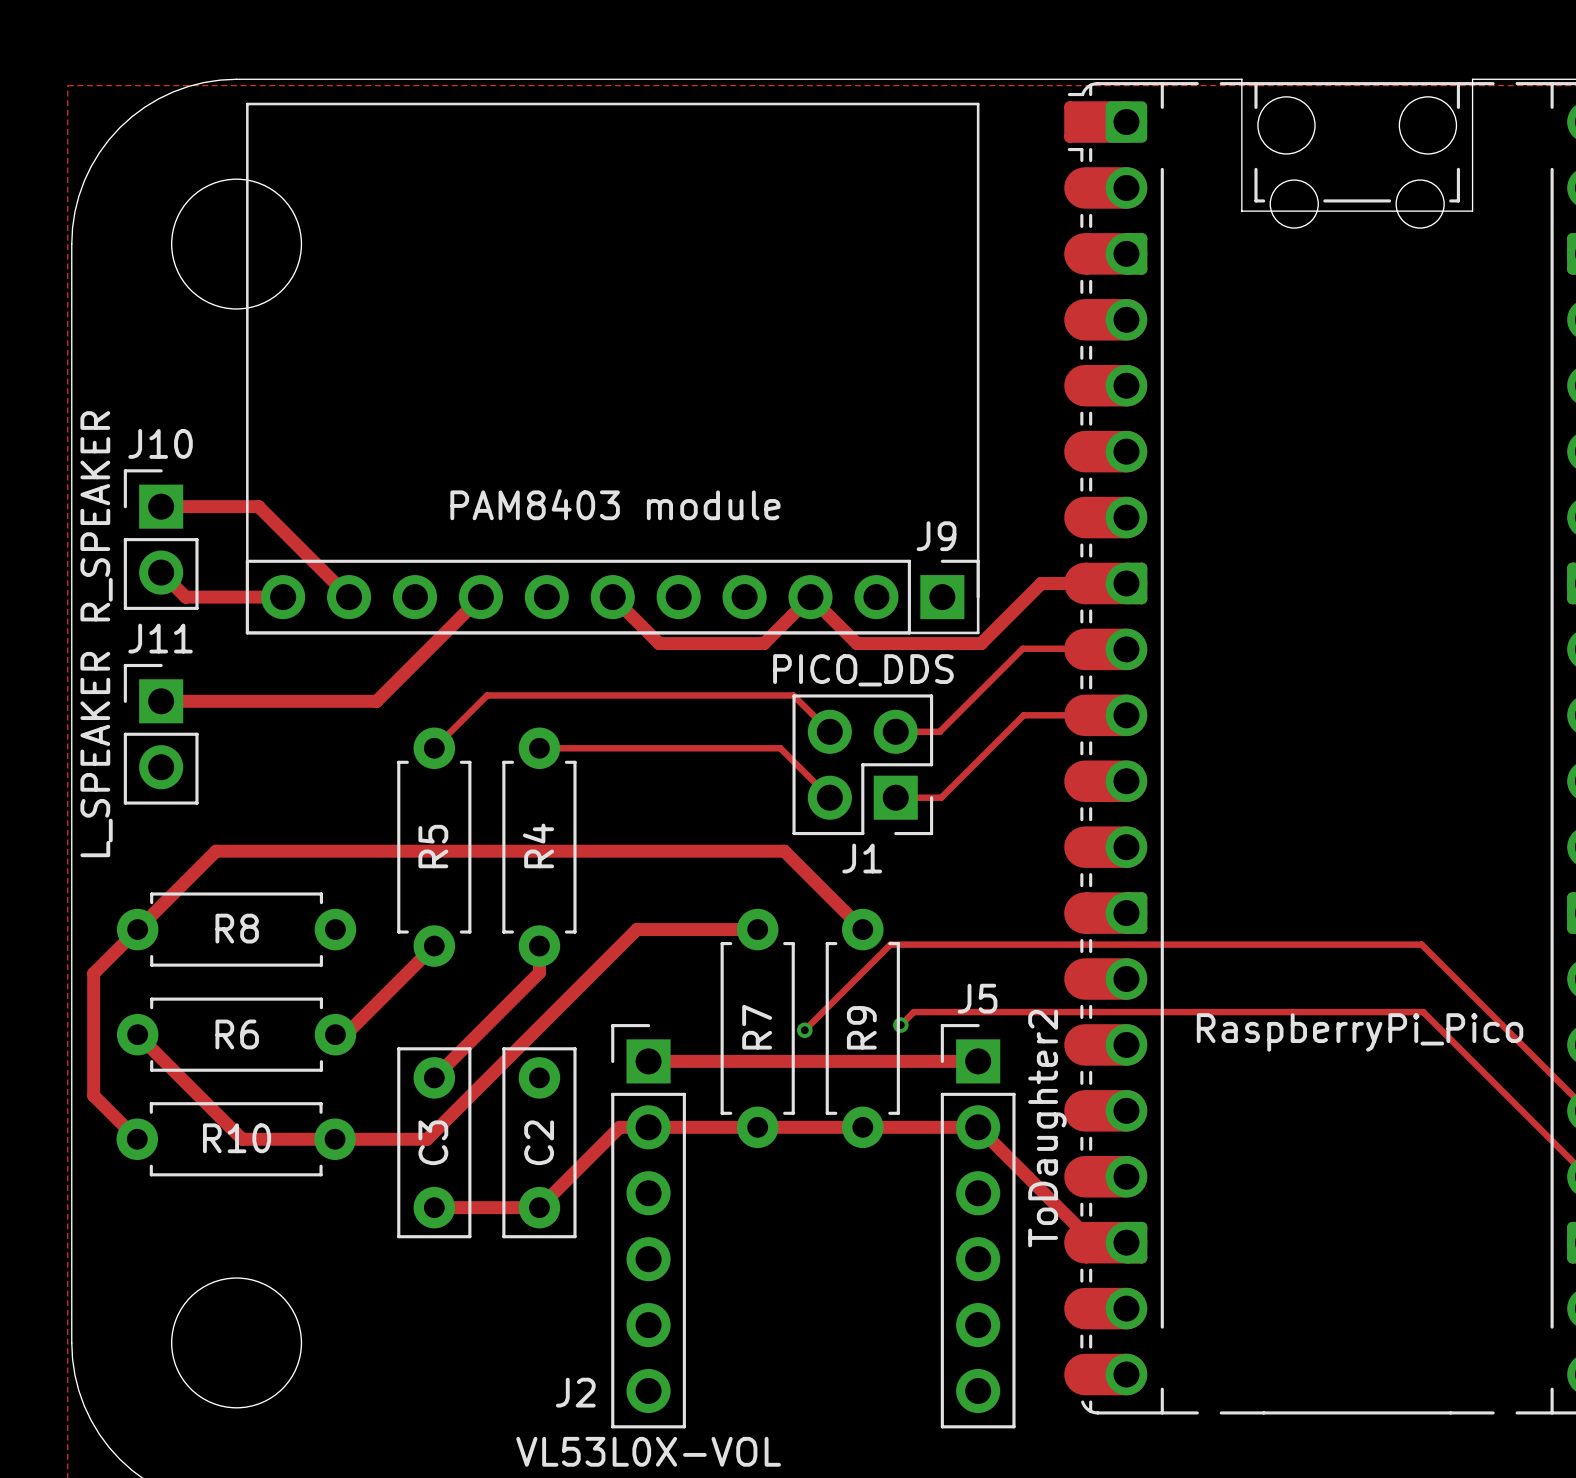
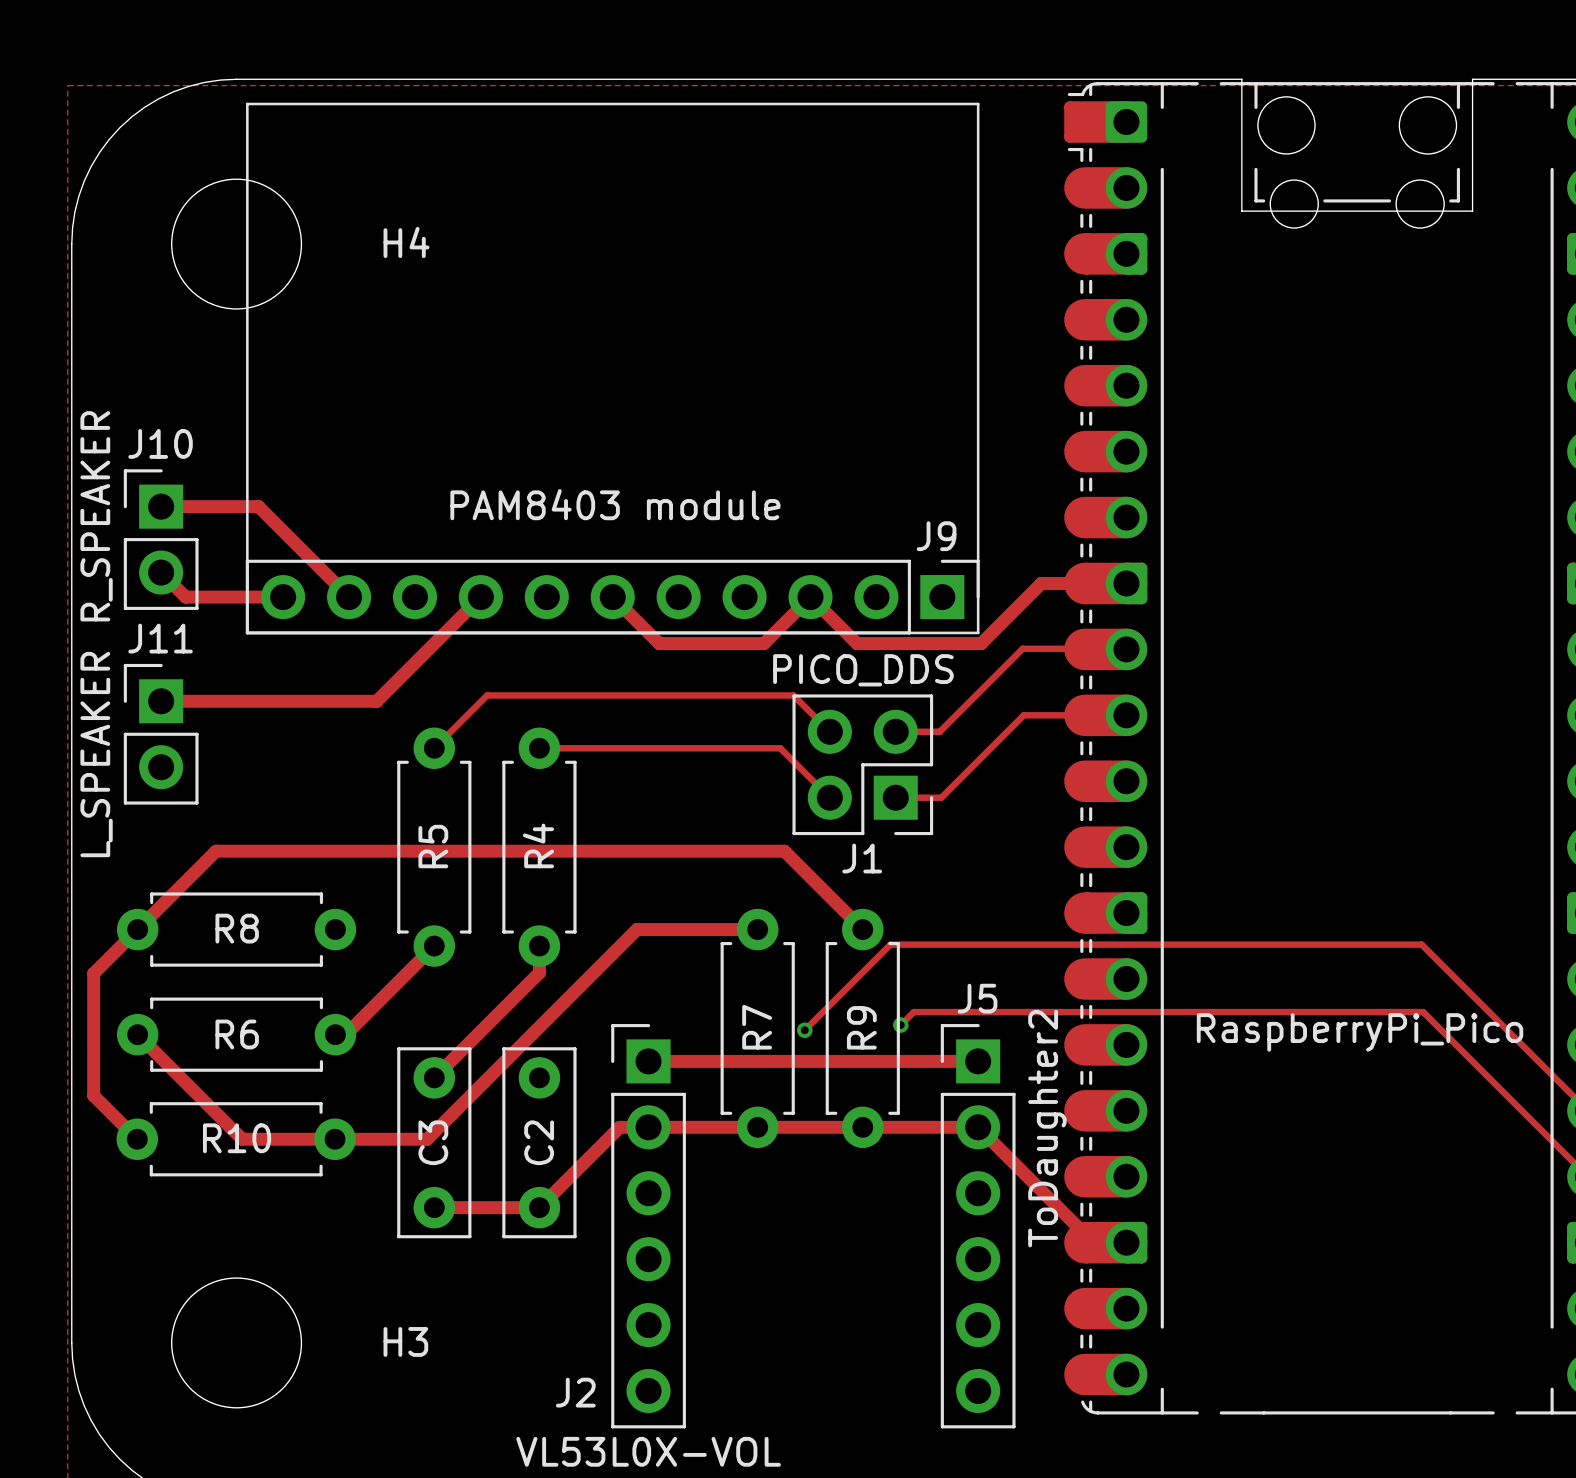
H4 name: none -> H4 (406, 242)
H3 name: none -> H3 (405, 1341)

